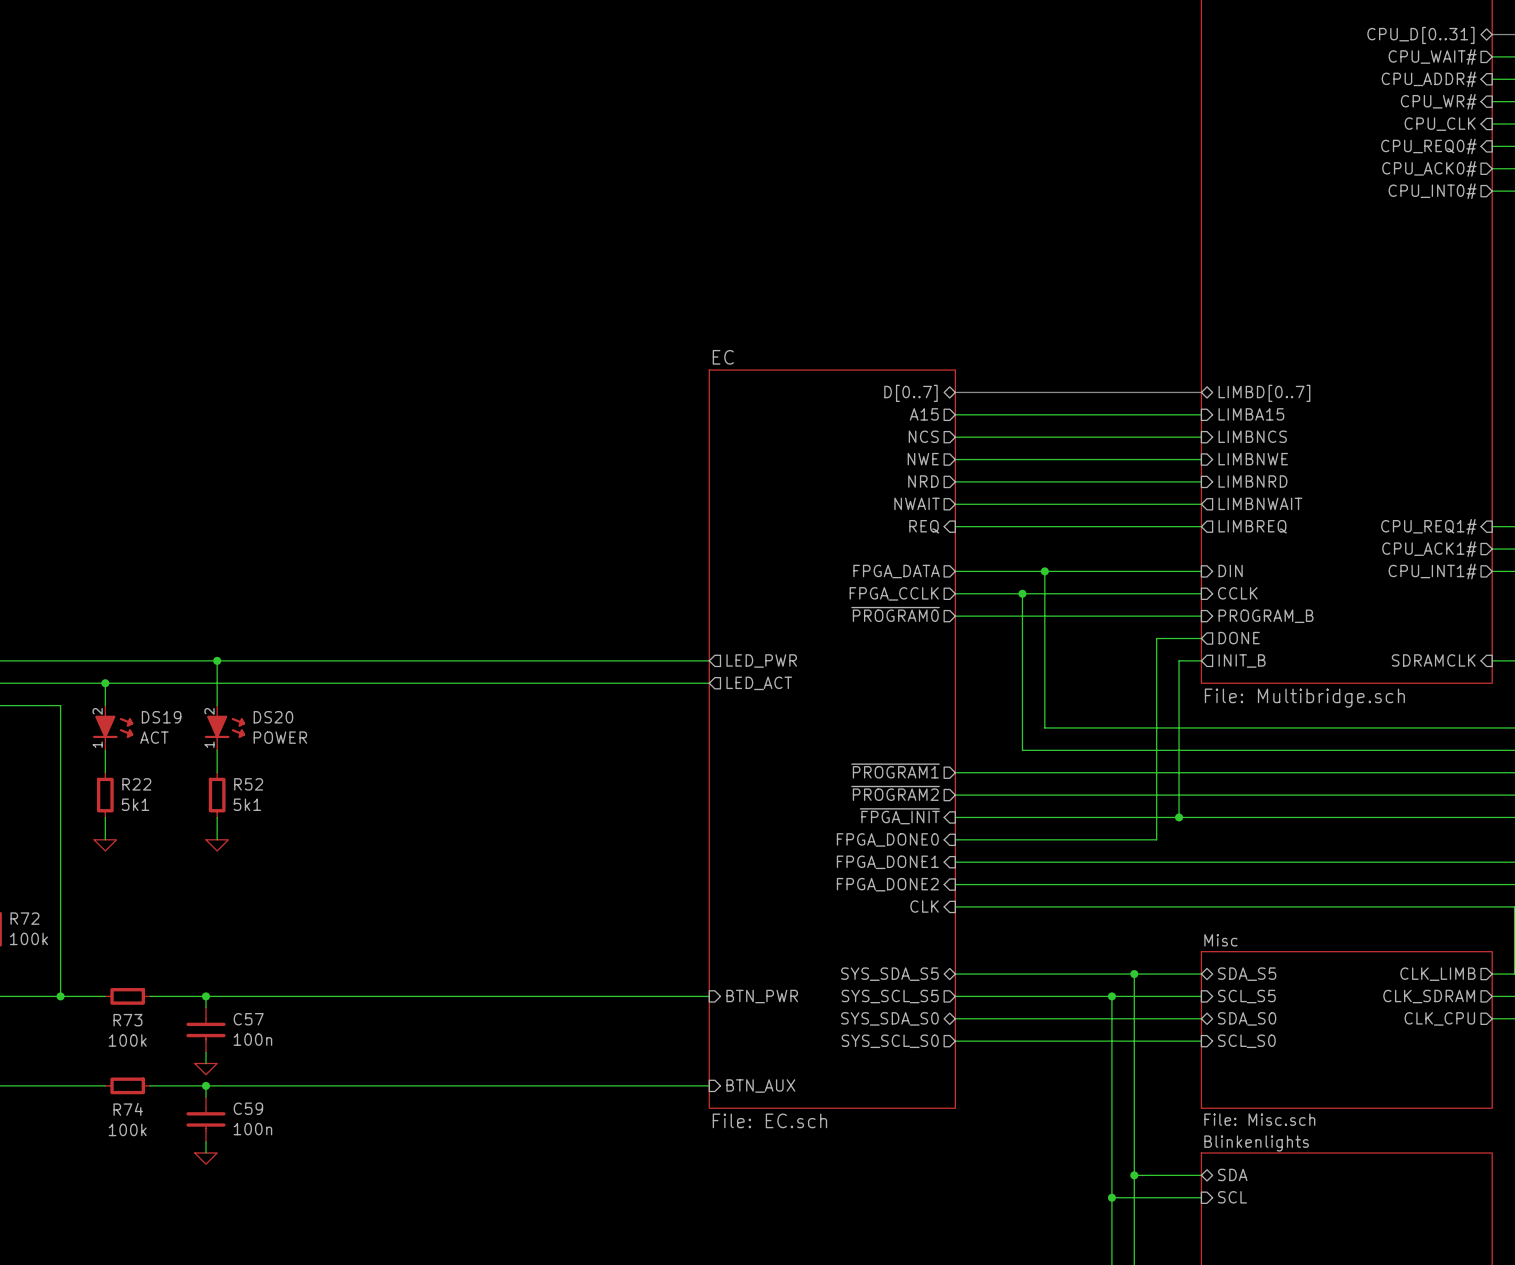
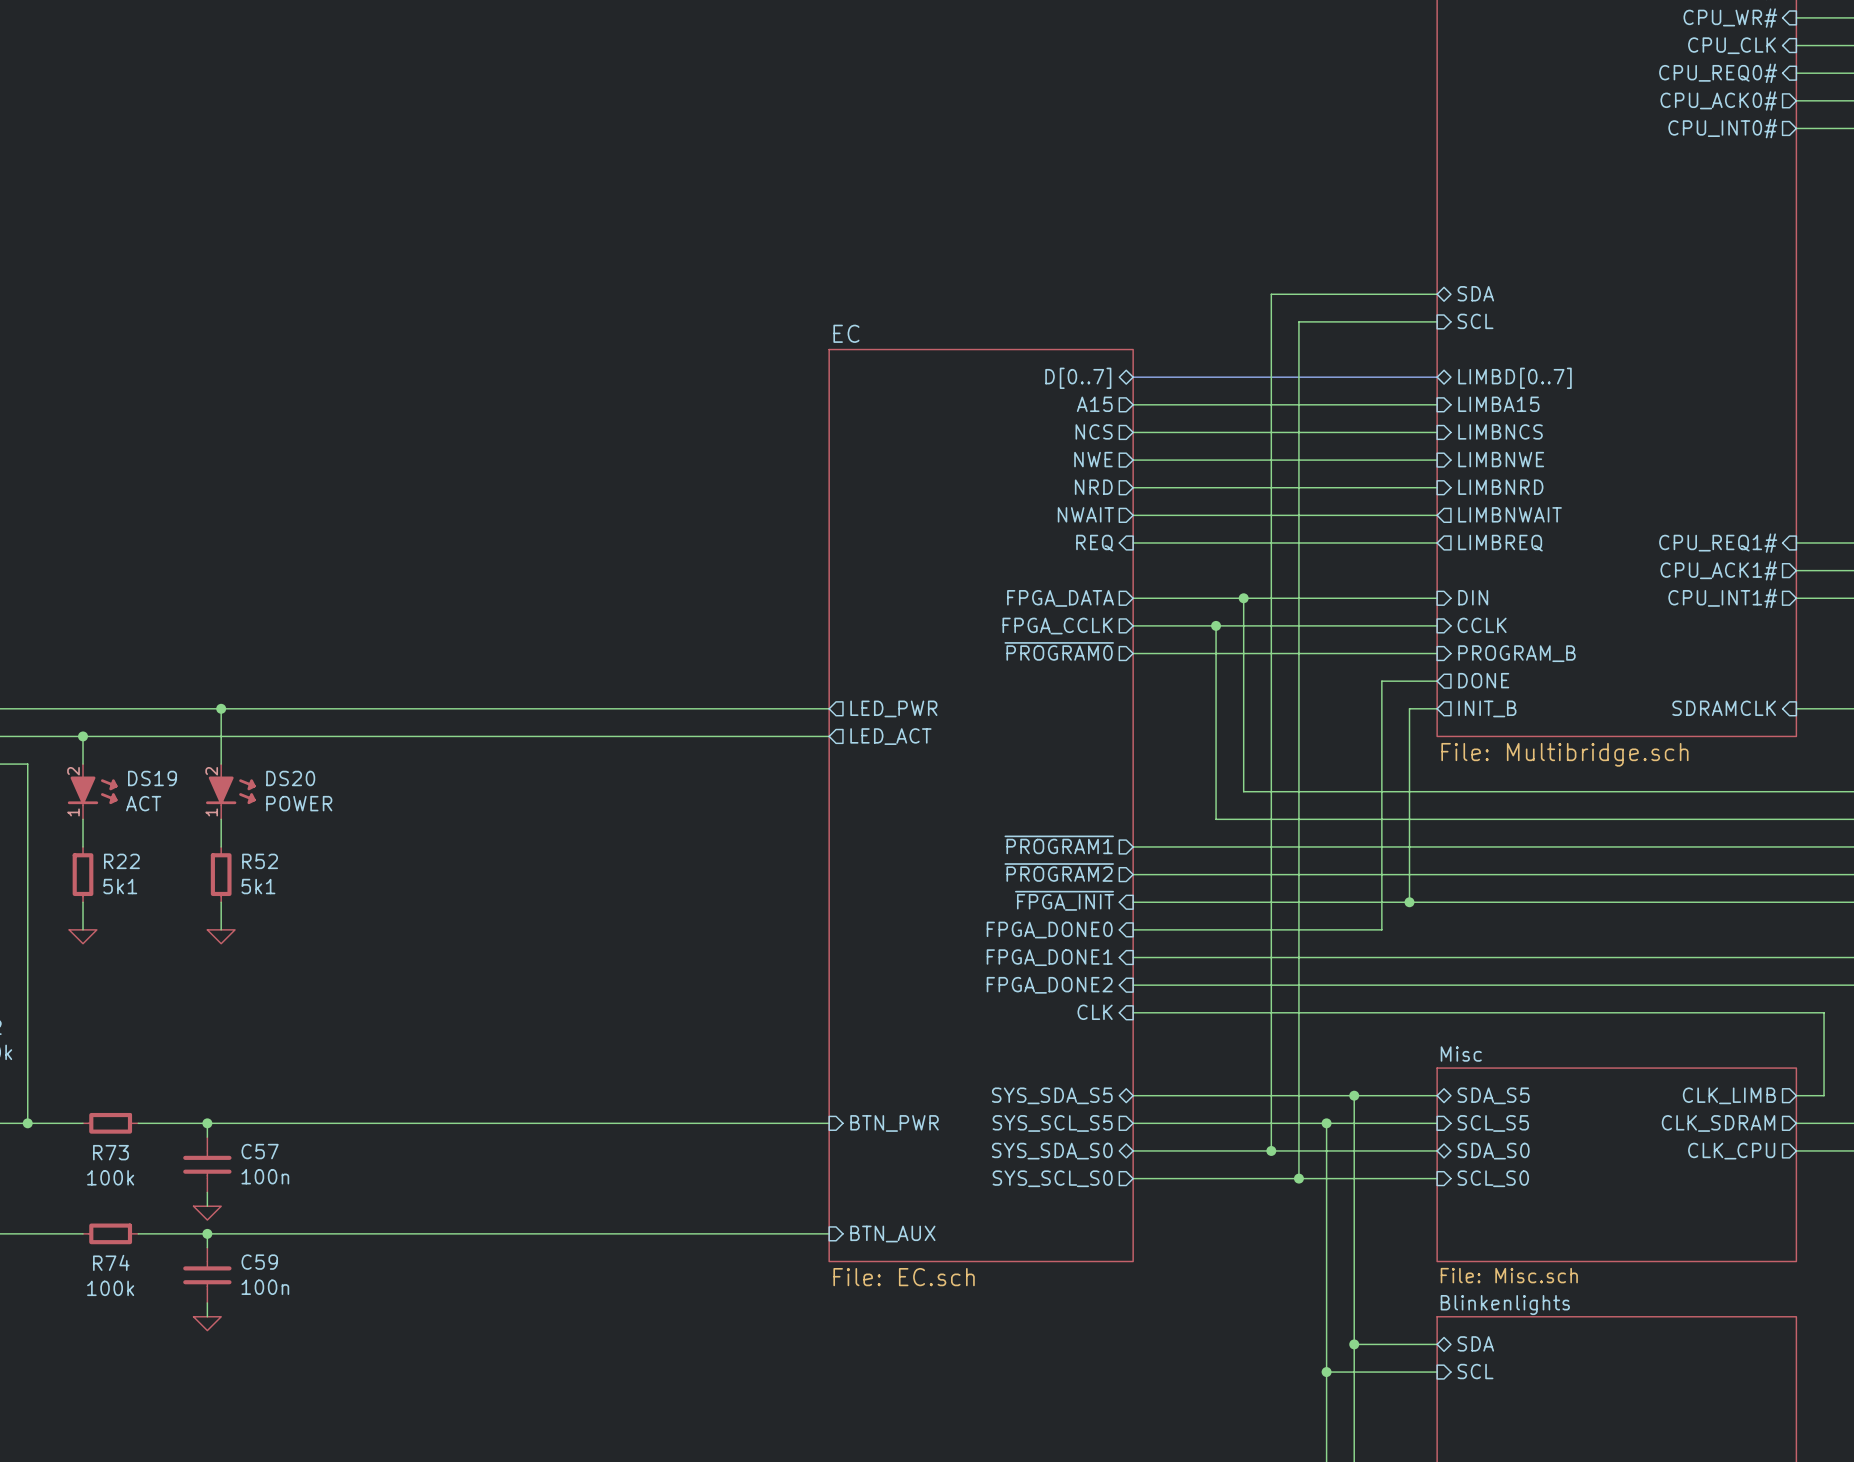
sheet pin: none -> SDA (1475, 293)
wire: none -> (1437, 294) (1271, 294) (1271, 1150)
wire: none -> (1437, 321) (1298, 321) (1298, 1178)
sheet pin: none -> SCL (1475, 321)
junction: none -> (1271, 1150)
junction: none -> (1298, 1178)

